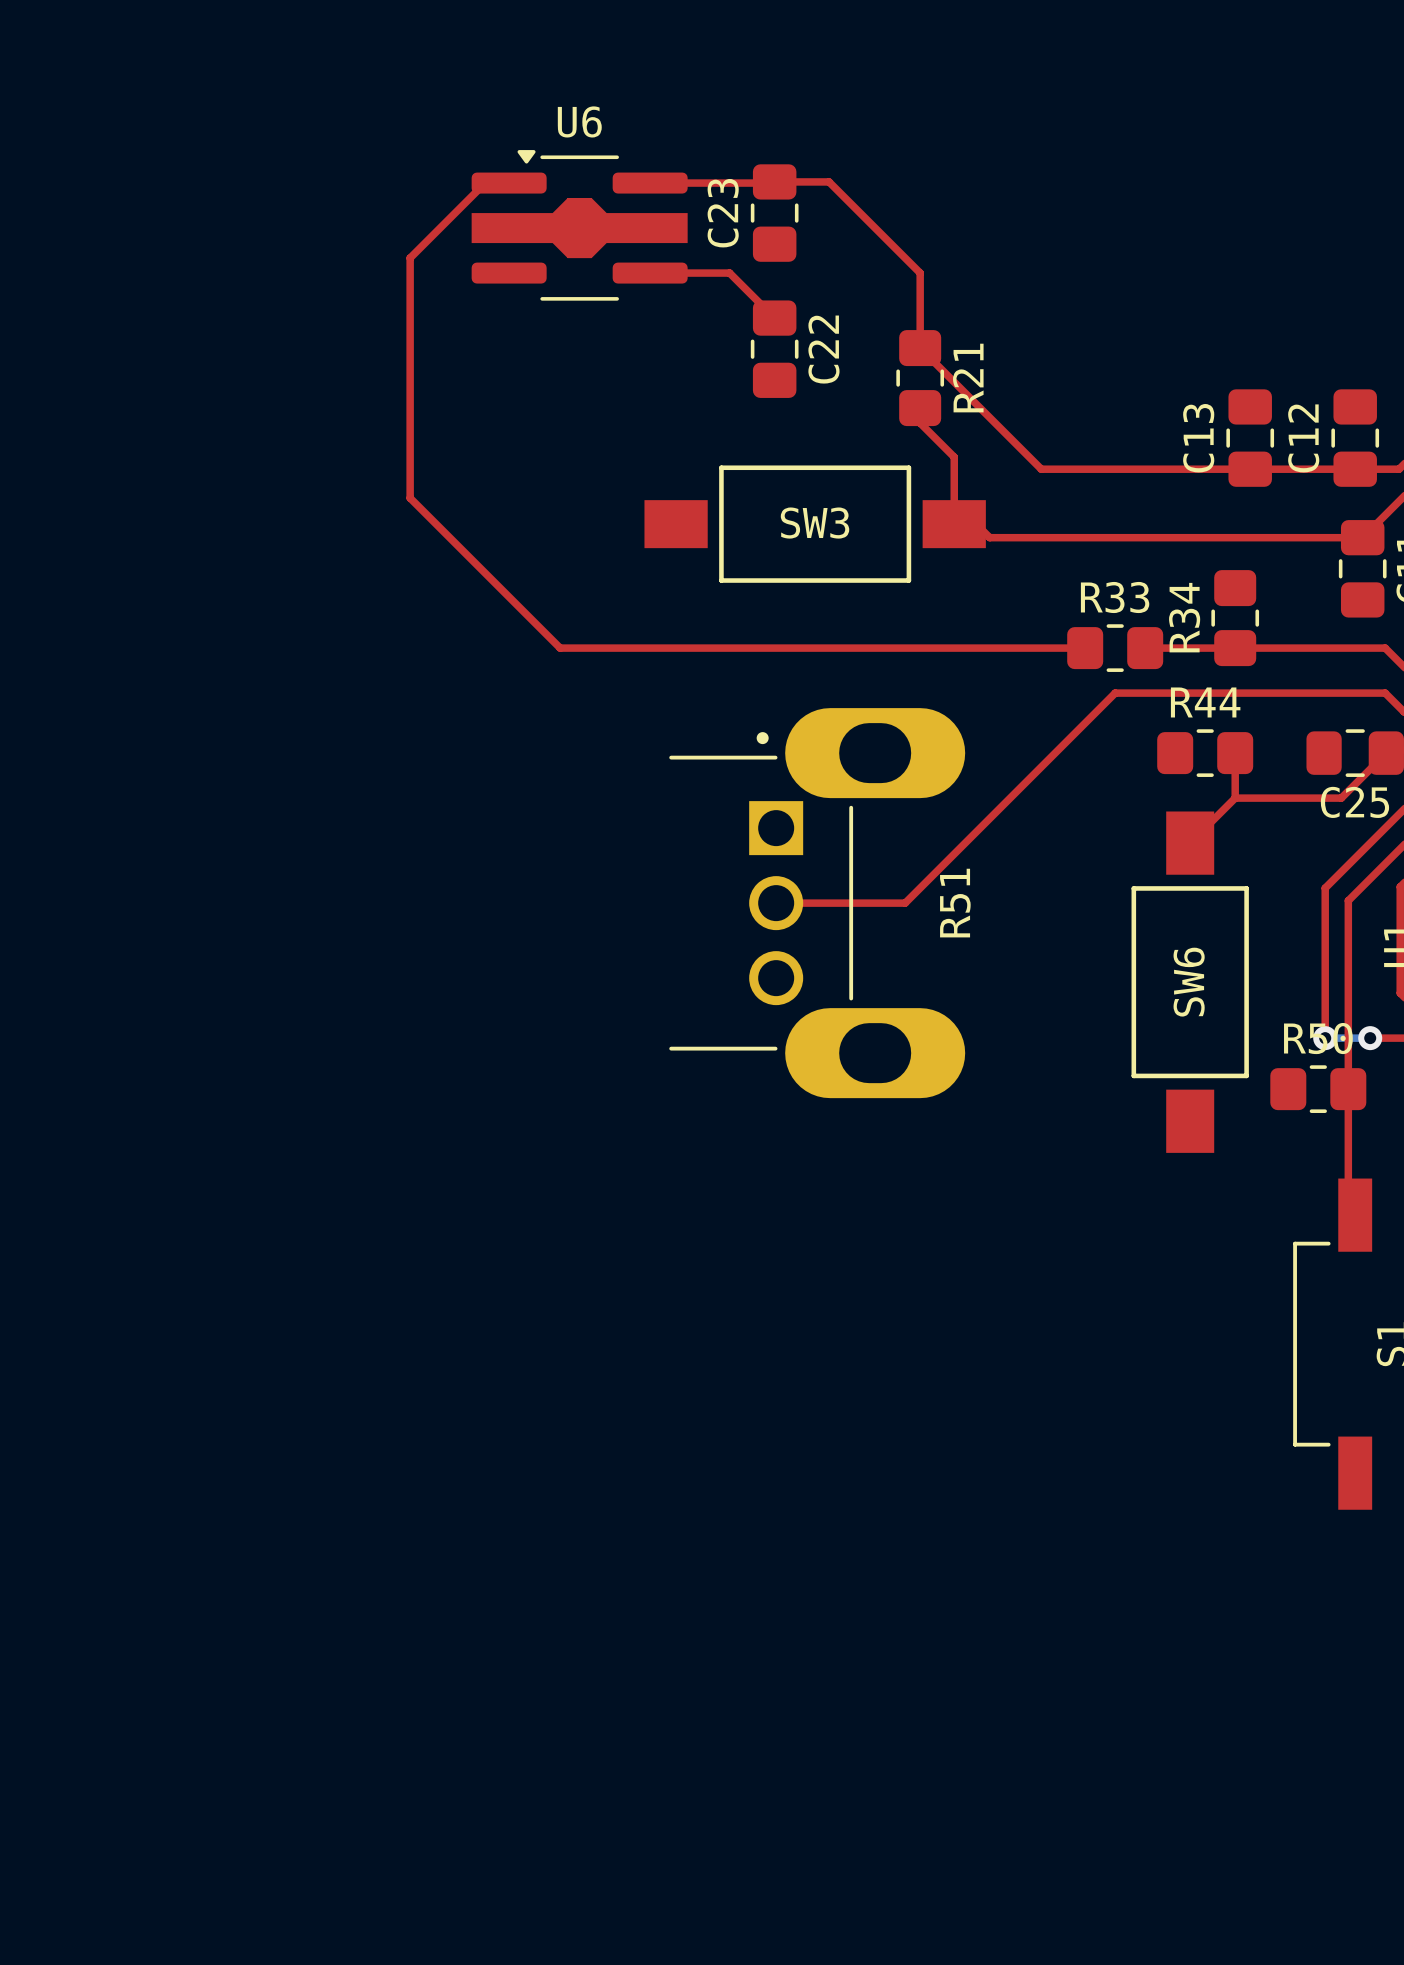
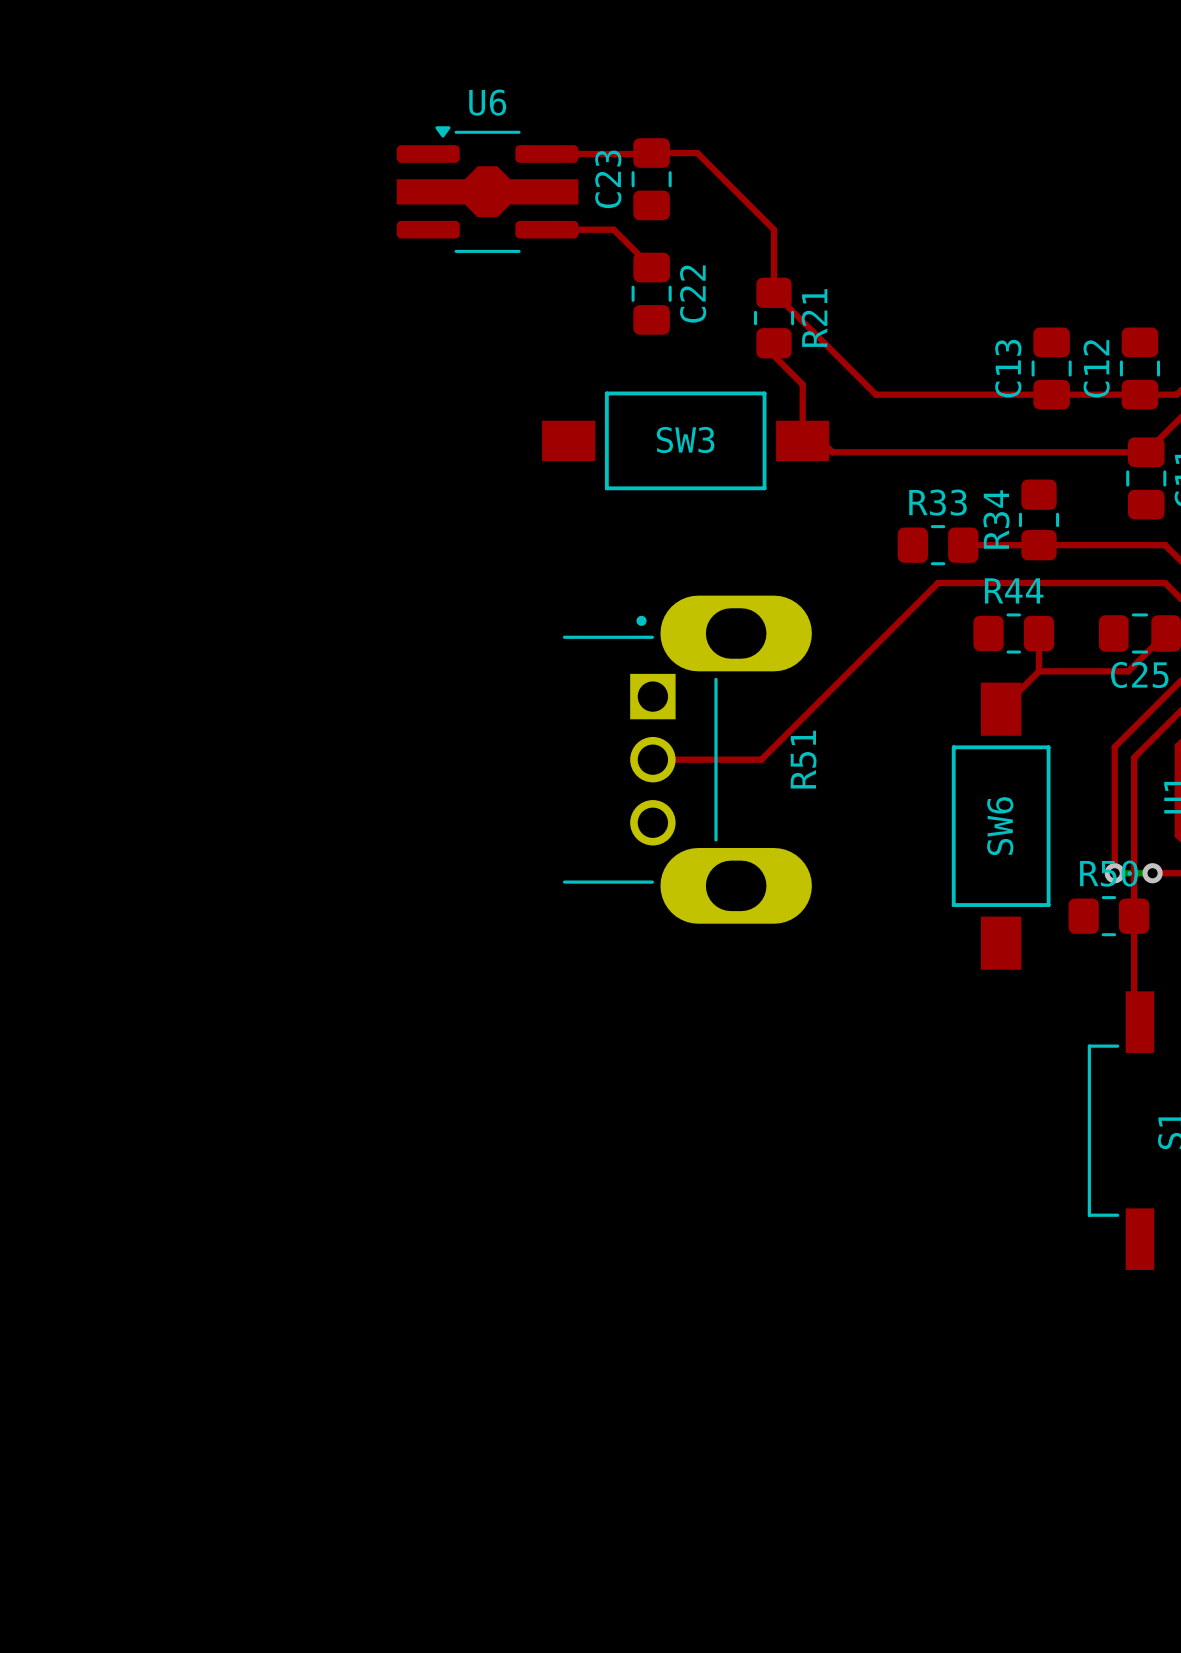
top track: (509, 183) (485, 183) (410, 258) (410, 498) (560, 648) (1085, 648) -> none

